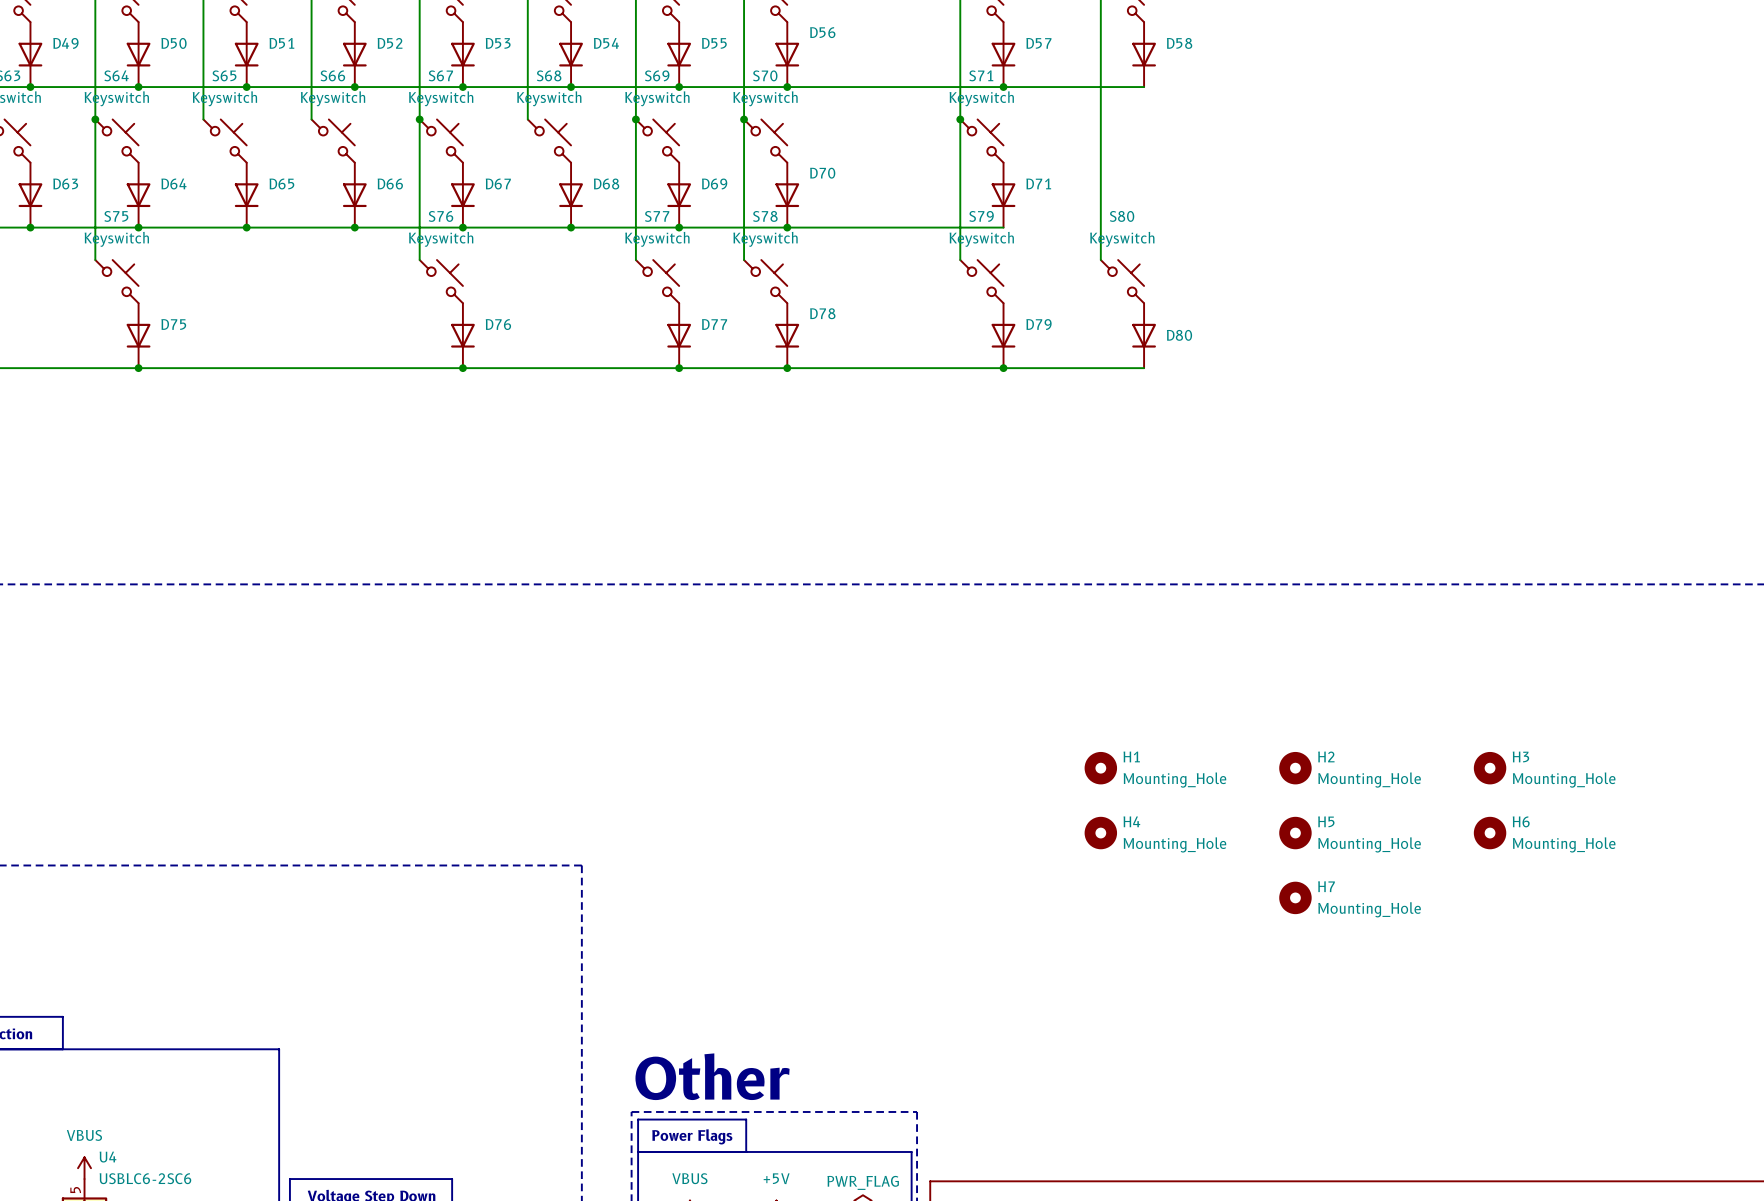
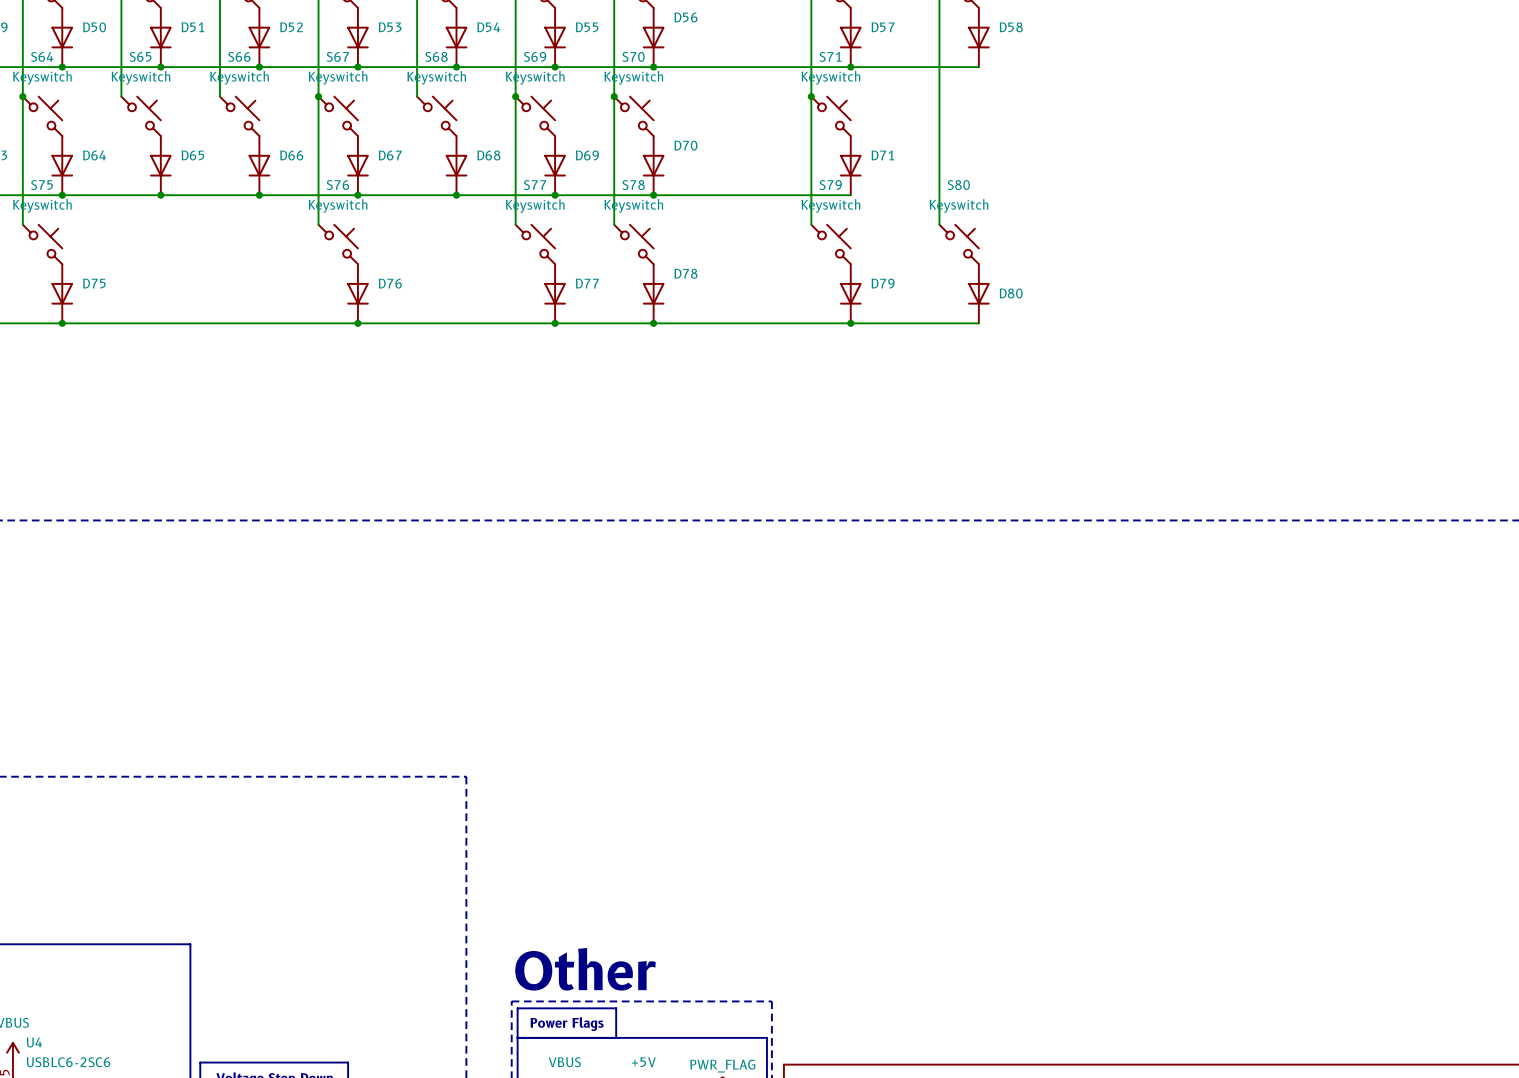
H1: Mounting_Hole (1100, 768) -> none
H2: Mounting_Hole (1295, 768) -> none
H3: Mounting_Hole (1490, 768) -> none
H4: Mounting_Hole (1100, 833) -> none
H5: Mounting_Hole (1295, 833) -> none
H6: Mounting_Hole (1490, 833) -> none
H7: Mounting_Hole (1295, 897) -> none

